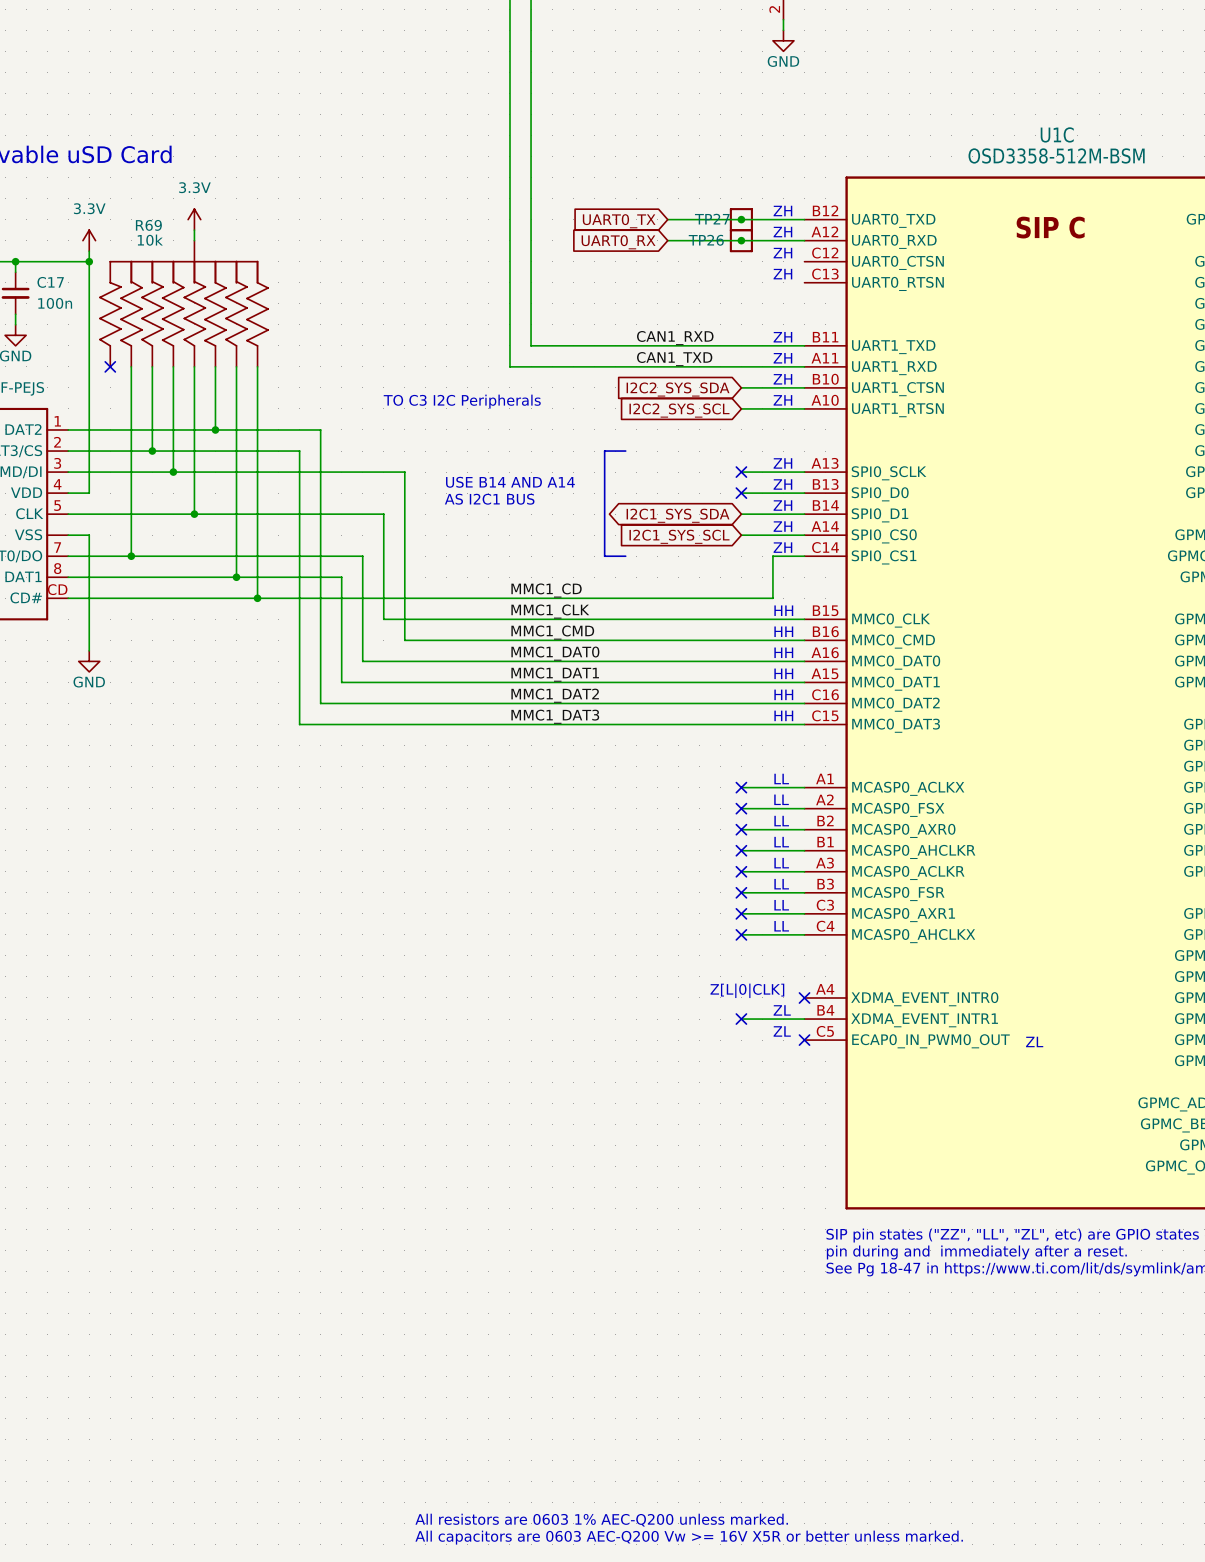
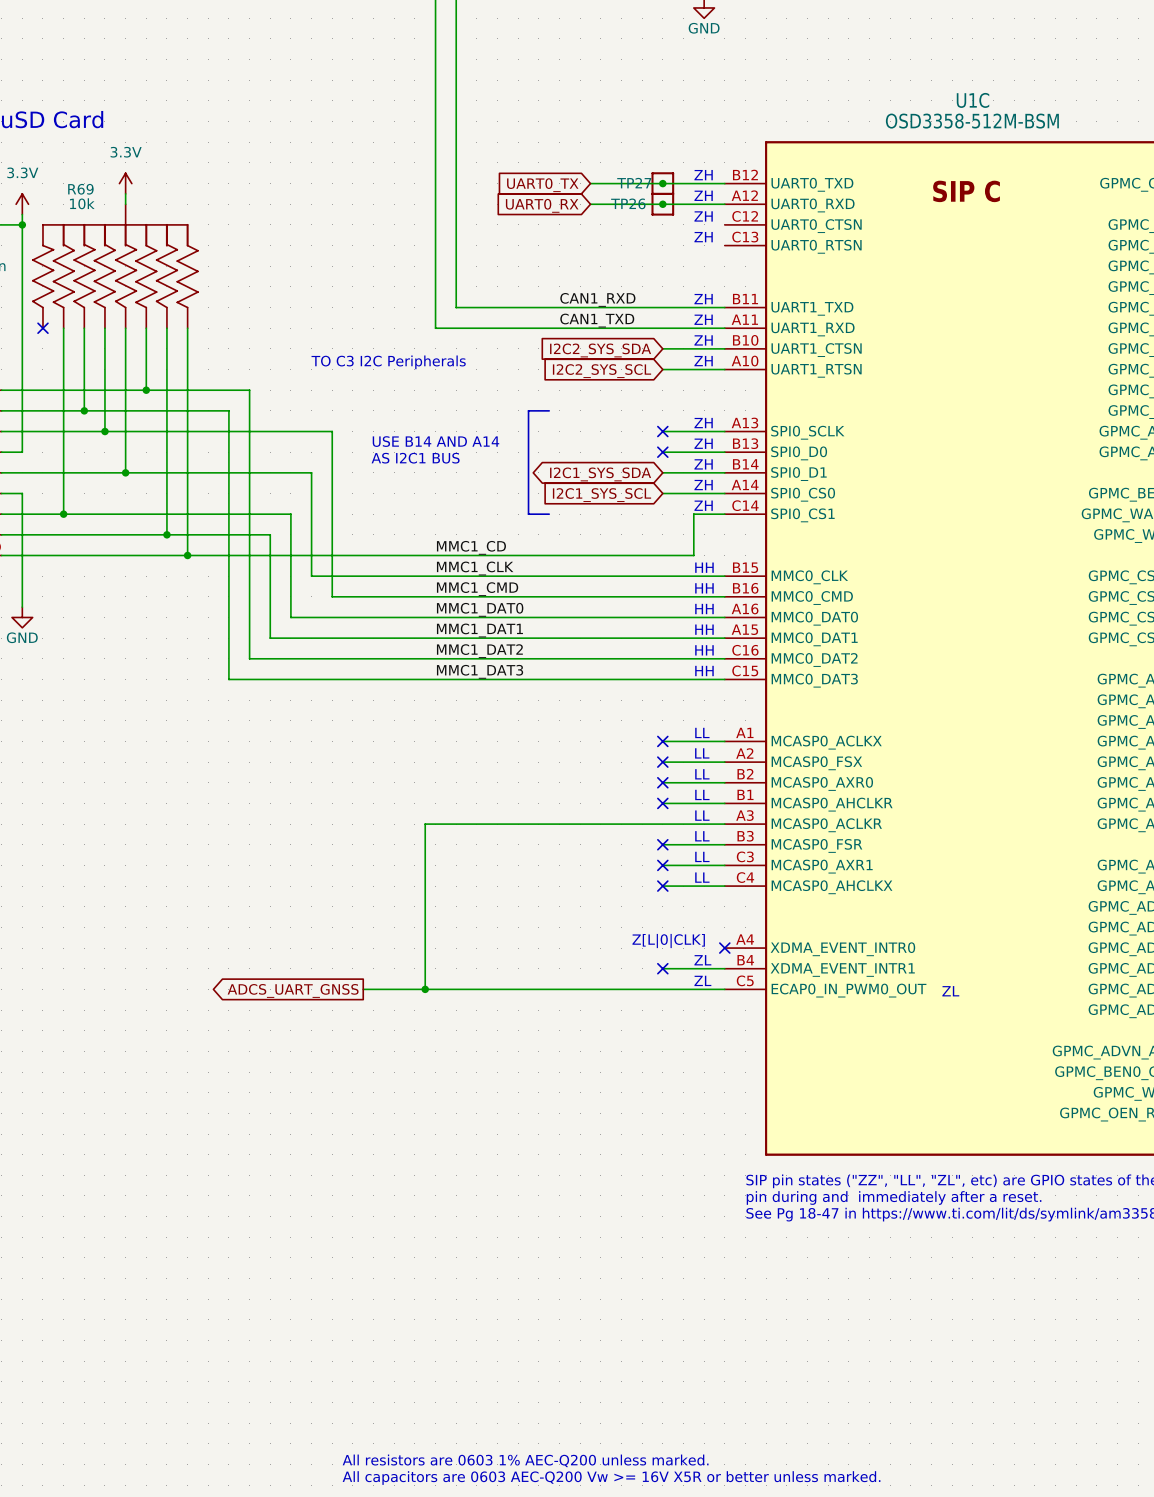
wire: none -> (662, 824) (425, 824) (425, 989)
no-connect mark: (741, 871) -> none
wire: none -> (363, 989) (724, 989)
junction: none -> (425, 989)
no-connect mark: (804, 1040) -> none
global label: none -> ADCS_UART_GNSS (293, 990)

